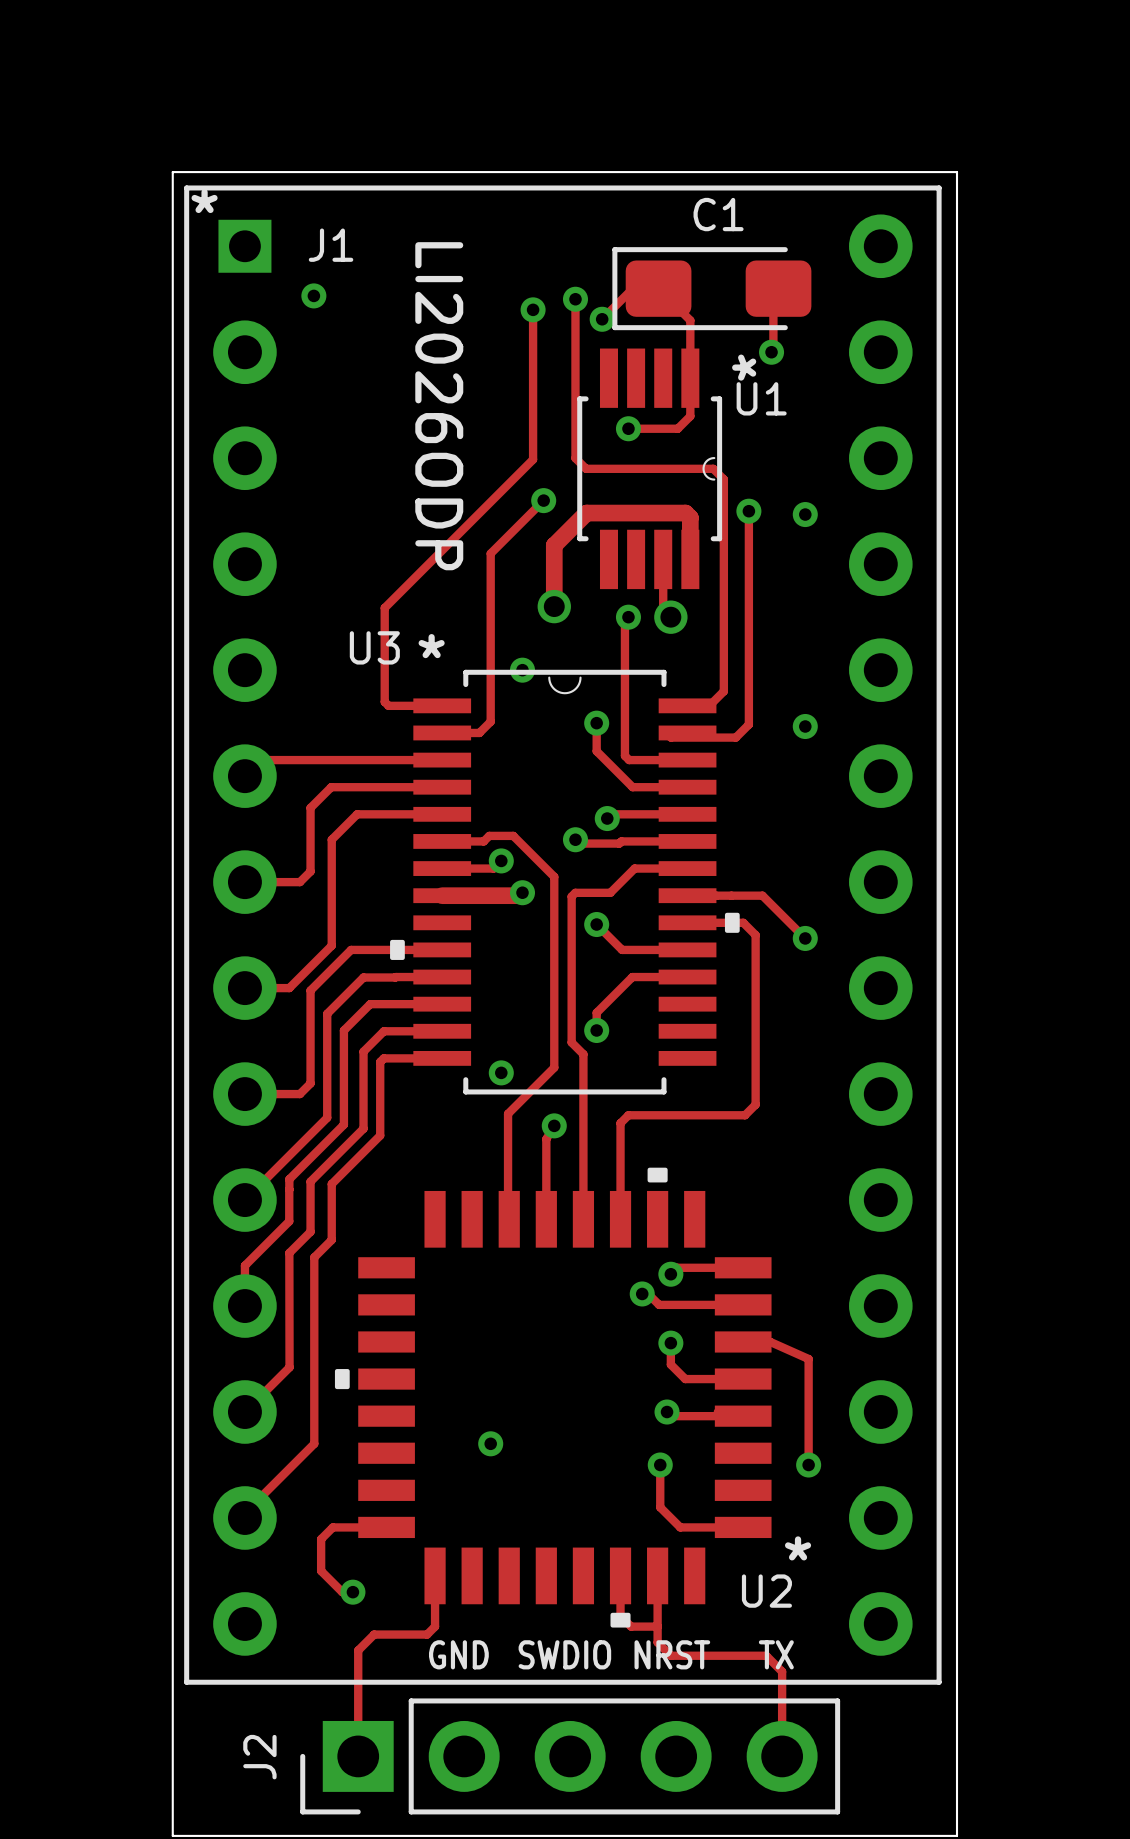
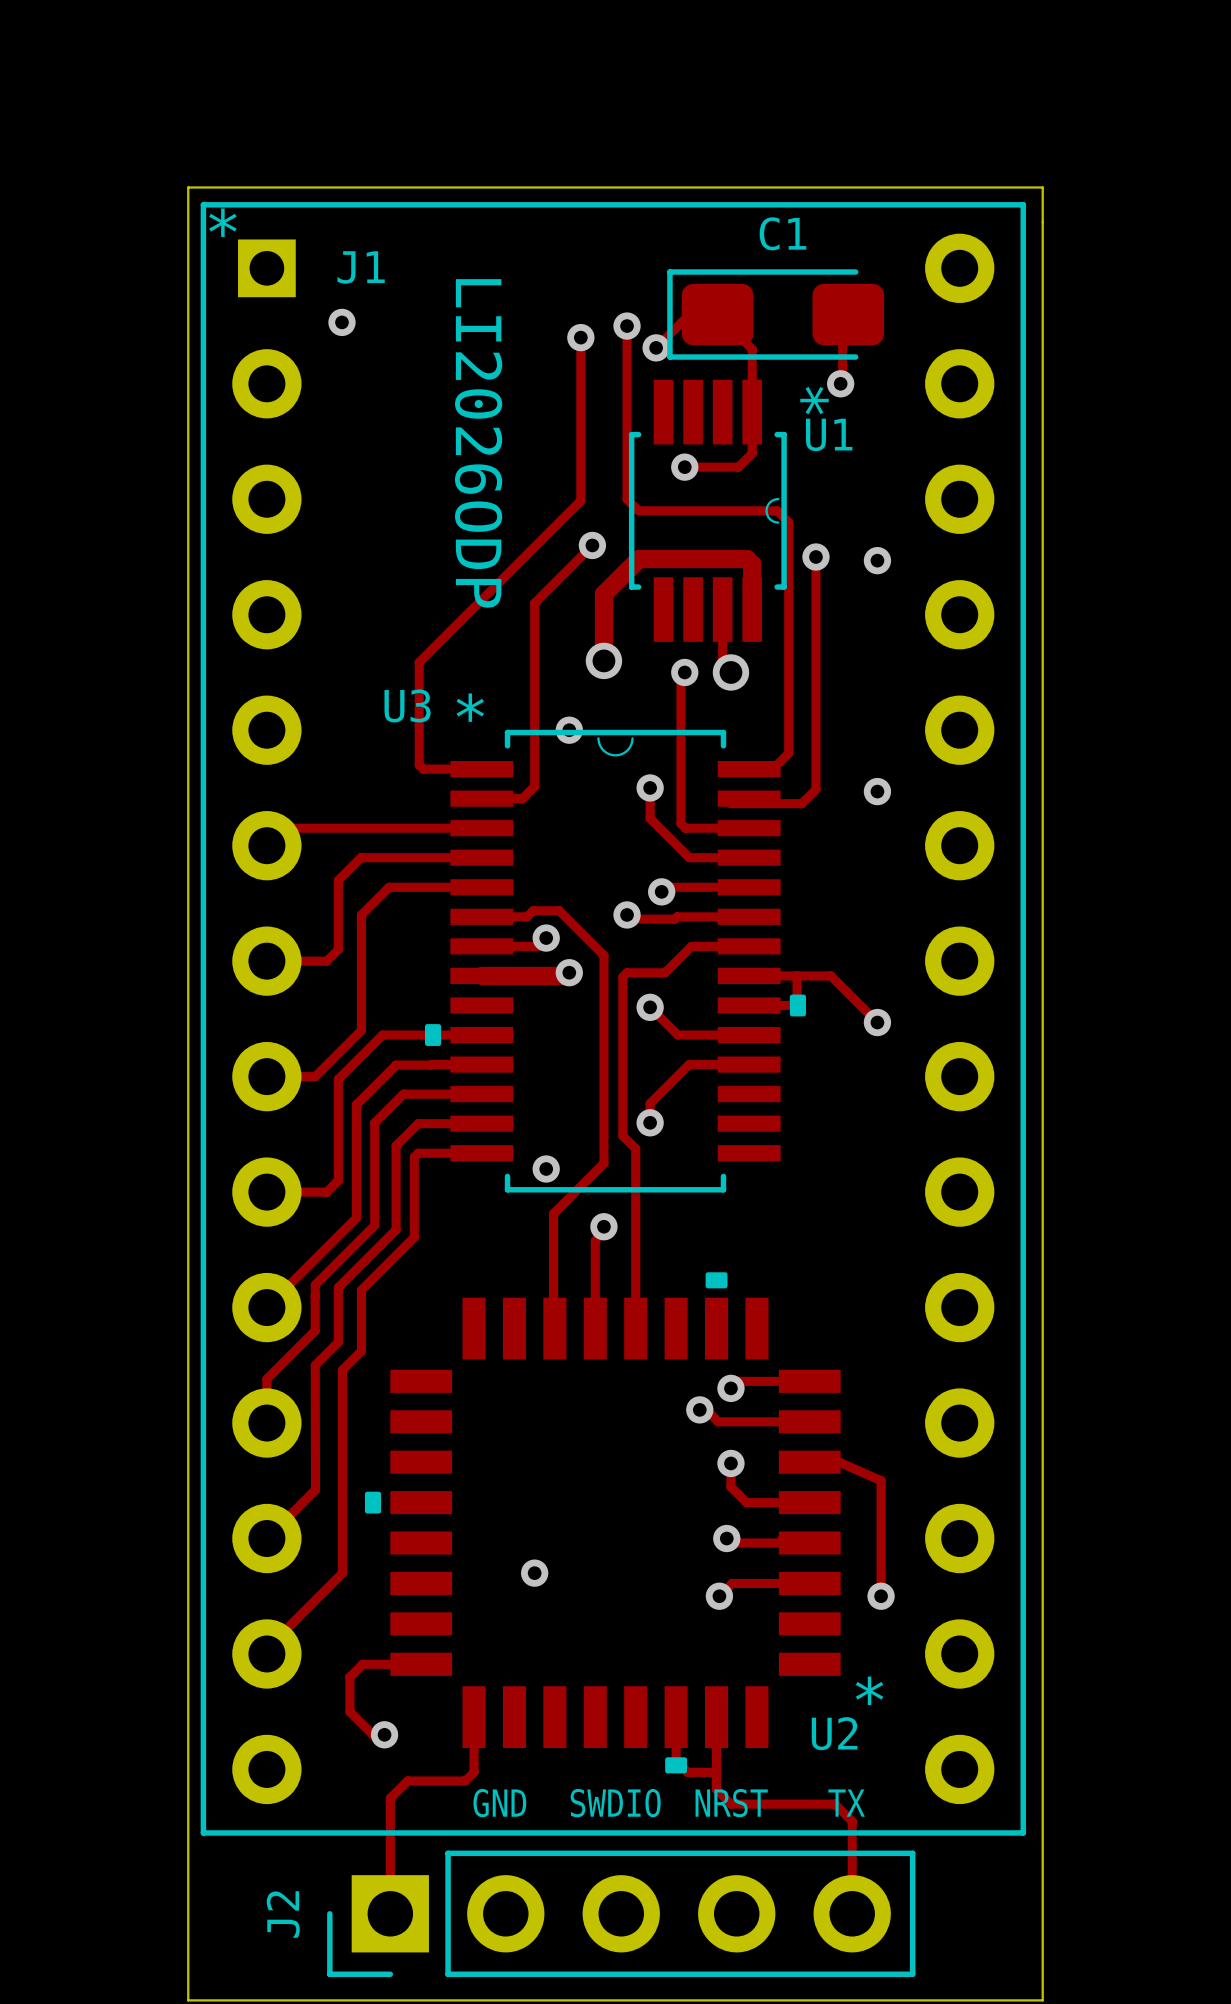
track: (725, 922) (743, 922) (755, 935) (755, 1104) (745, 1115) (628, 1115) (620, 1123) (620, 1219) -> (790, 1005) (797, 999) (797, 975)
track: (660, 1464) (660, 1507) (680, 1527) (743, 1527) -> (719, 1596) (732, 1583) (809, 1583)

